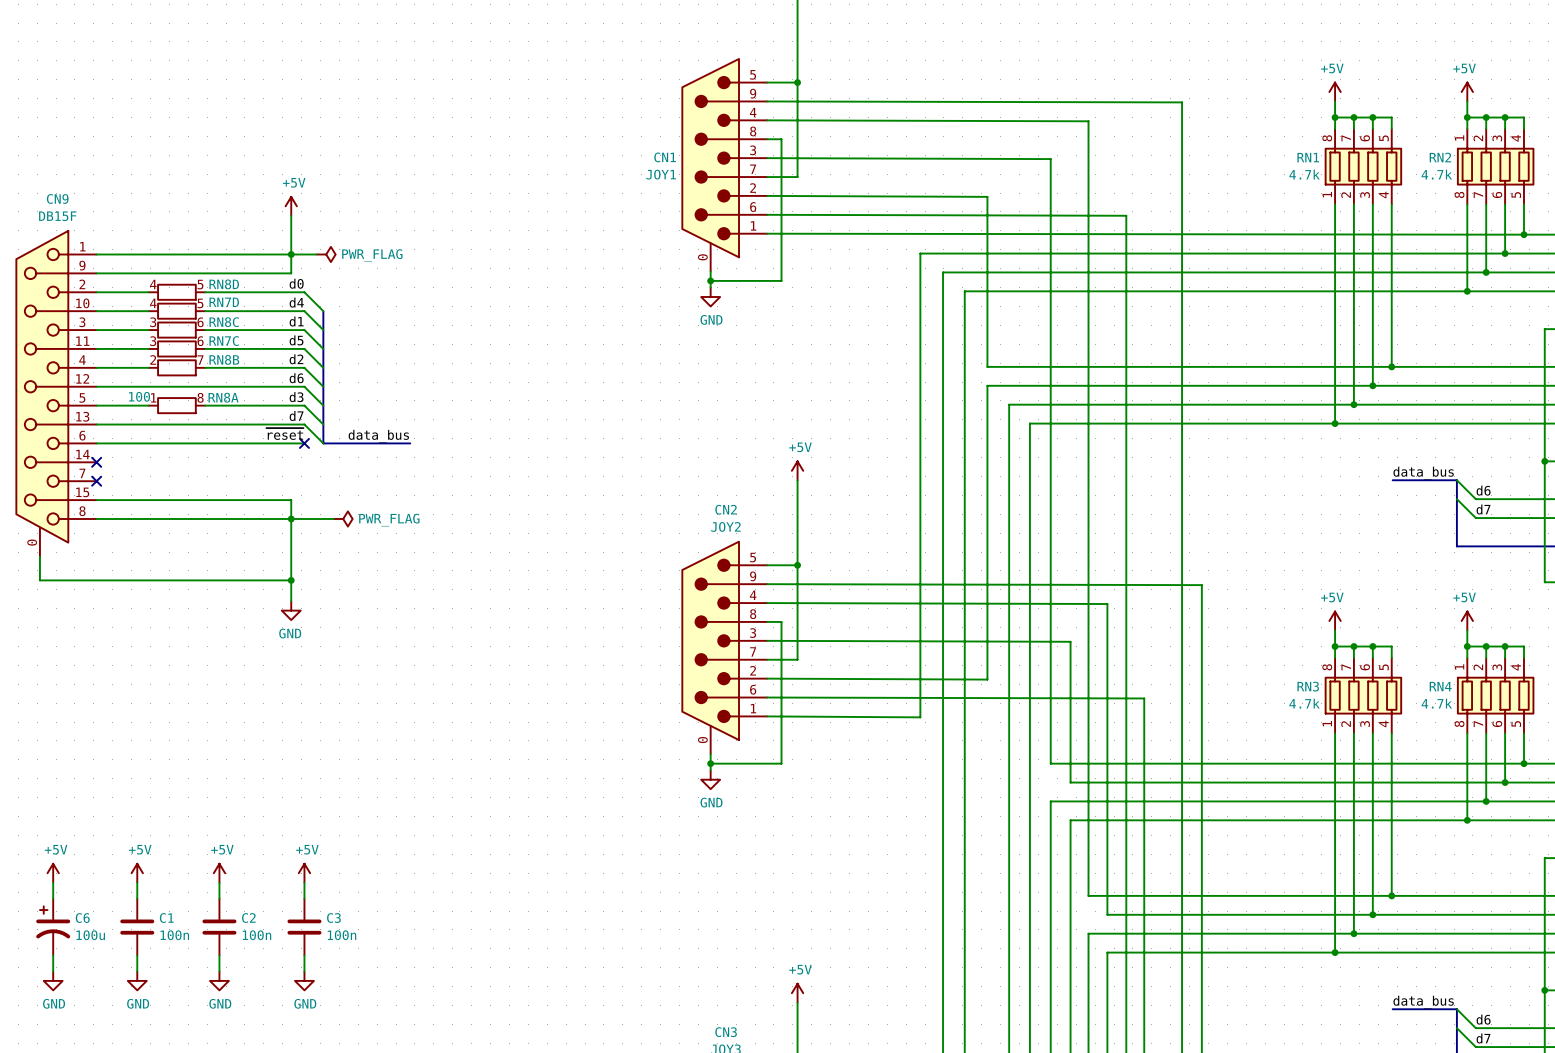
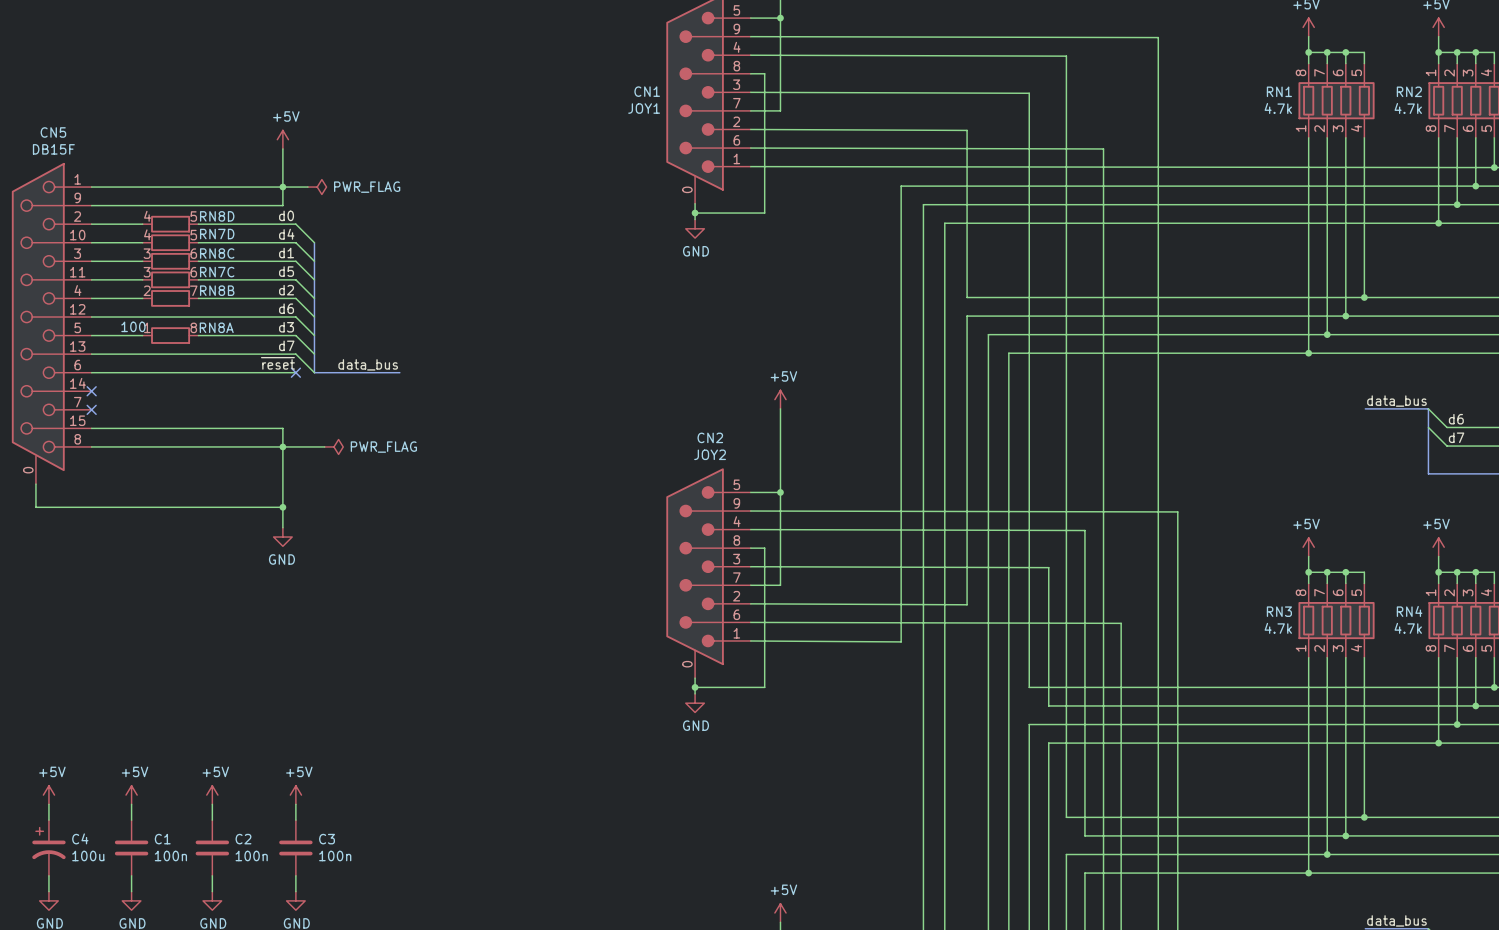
CN9 name: CN9 (57, 198) -> CN5 (53, 132)
C6 name: C6 (82, 918) -> C4 (80, 838)

